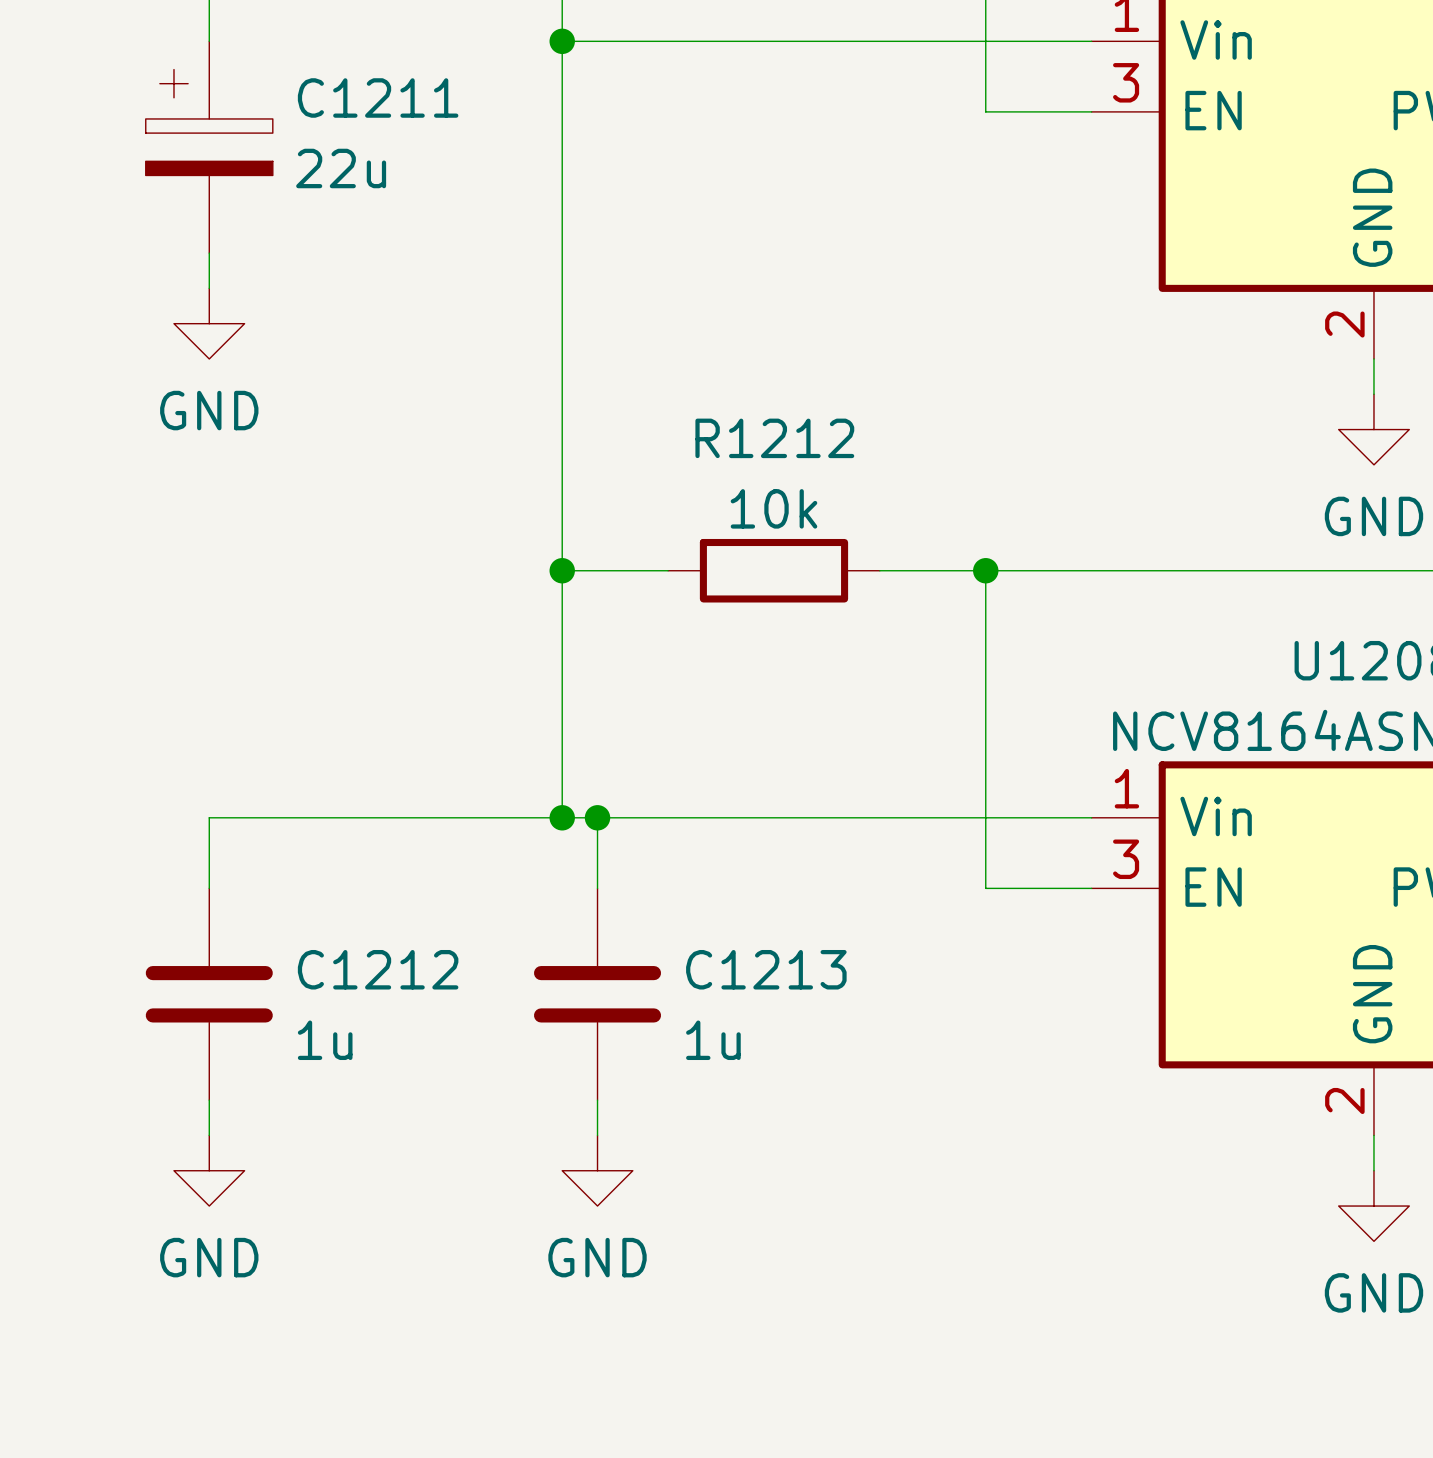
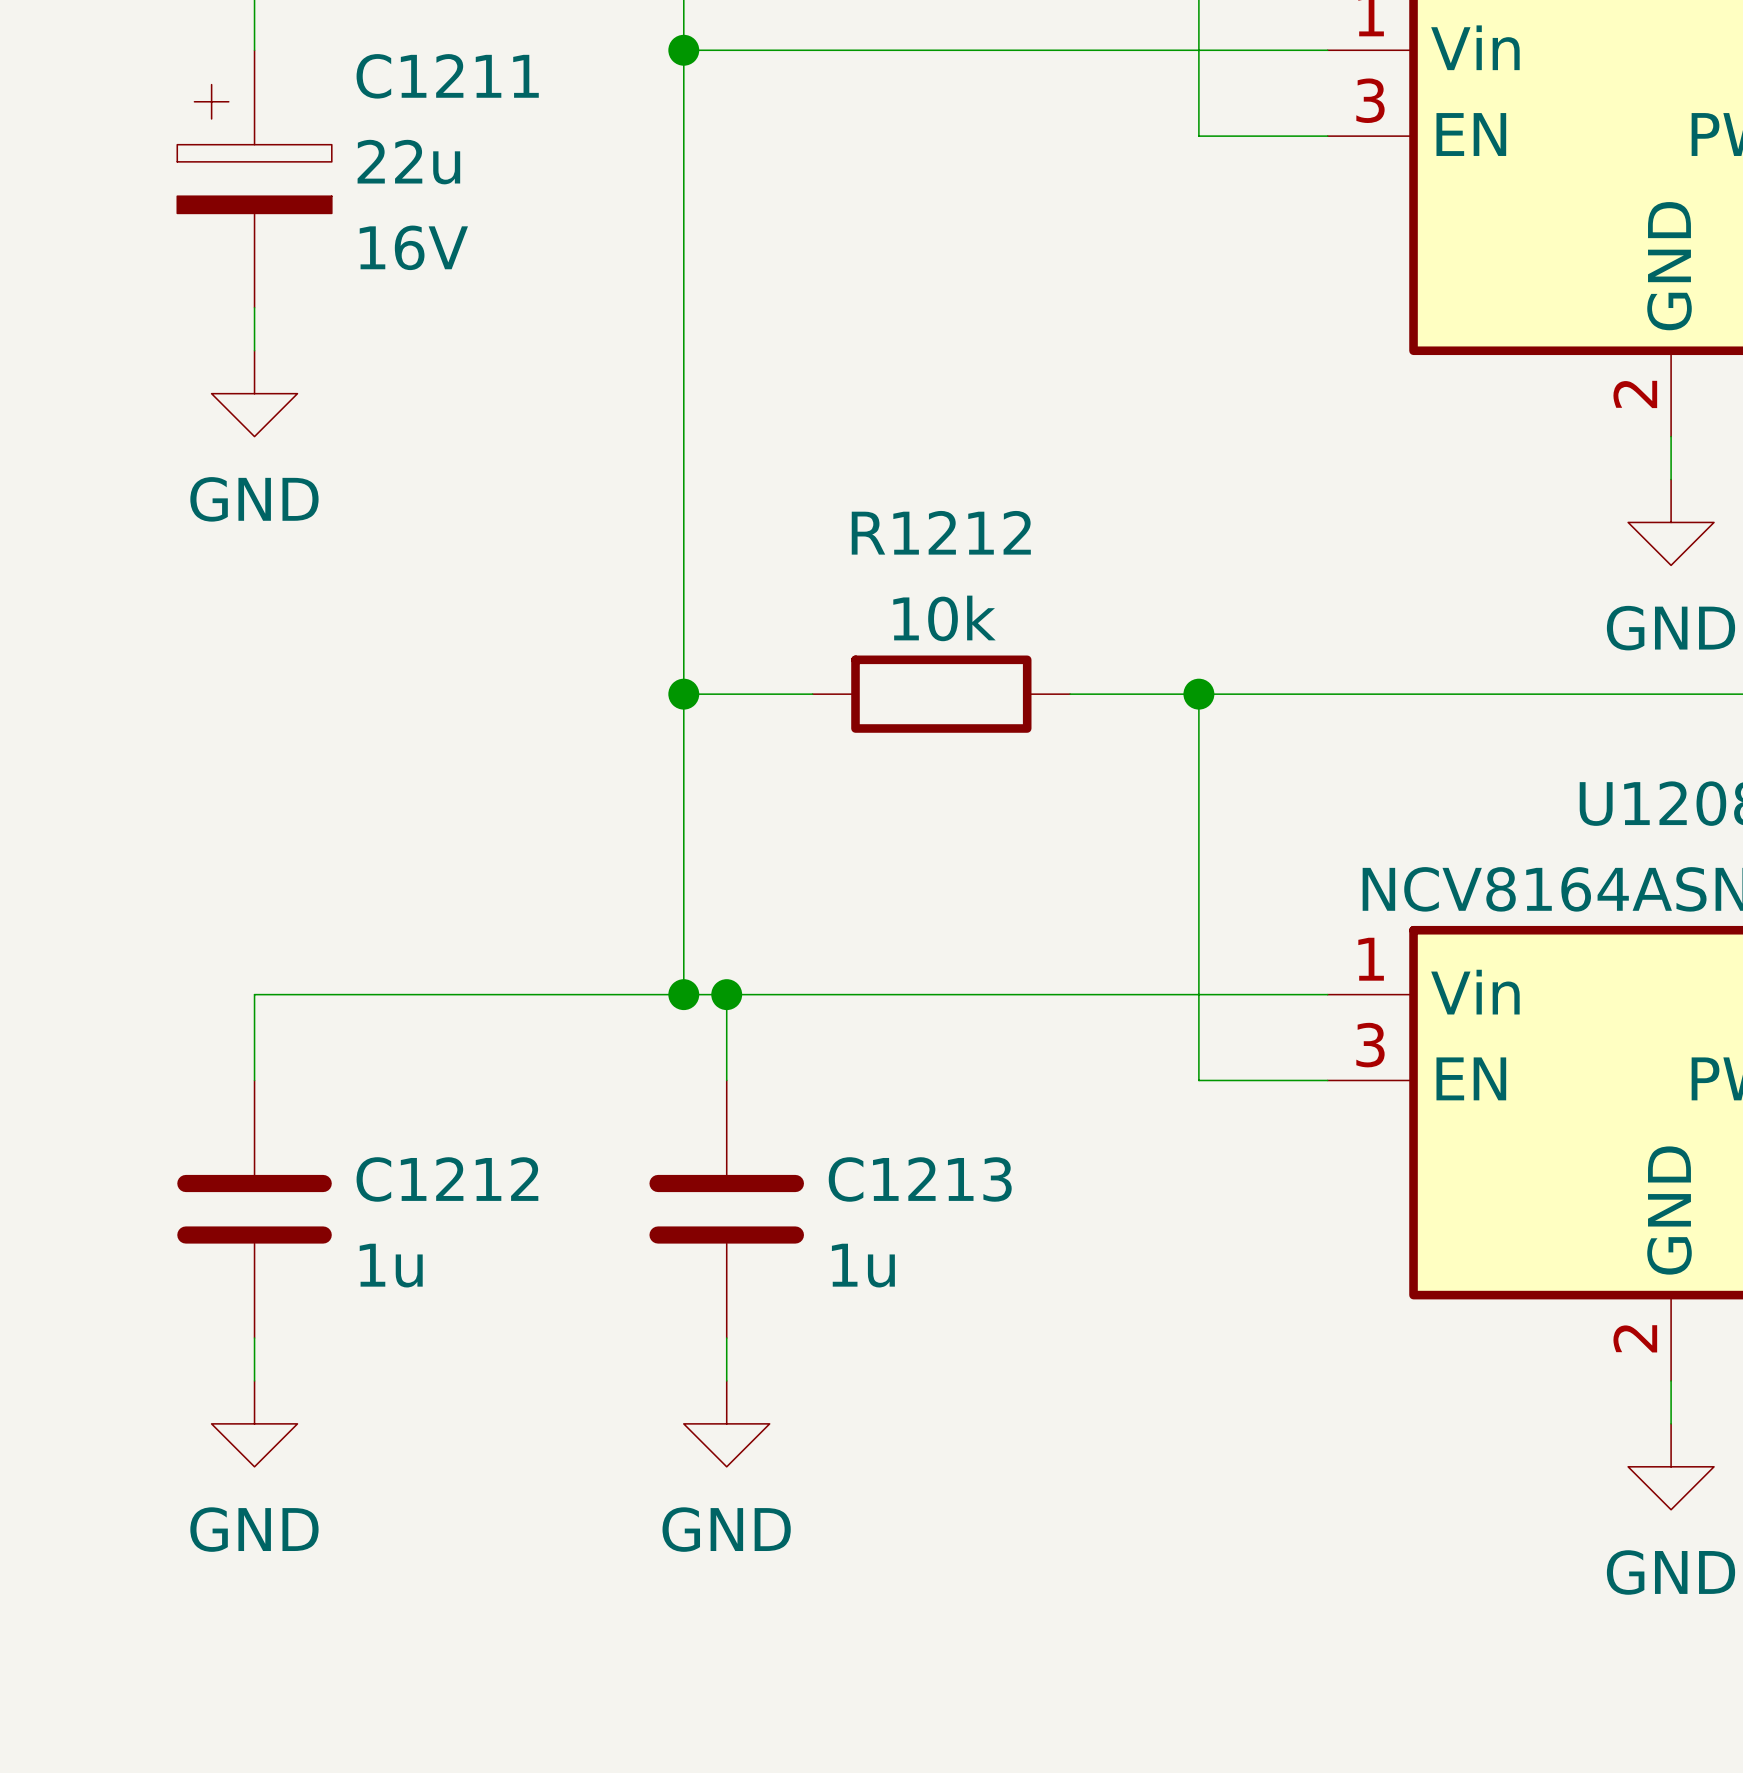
C1211 name position: C1211 (378, 97) -> C1211 (447, 76)
C1211 value position: 22u (341, 168) -> 22u (408, 162)
C1211 text: none -> 16V (413, 247)

